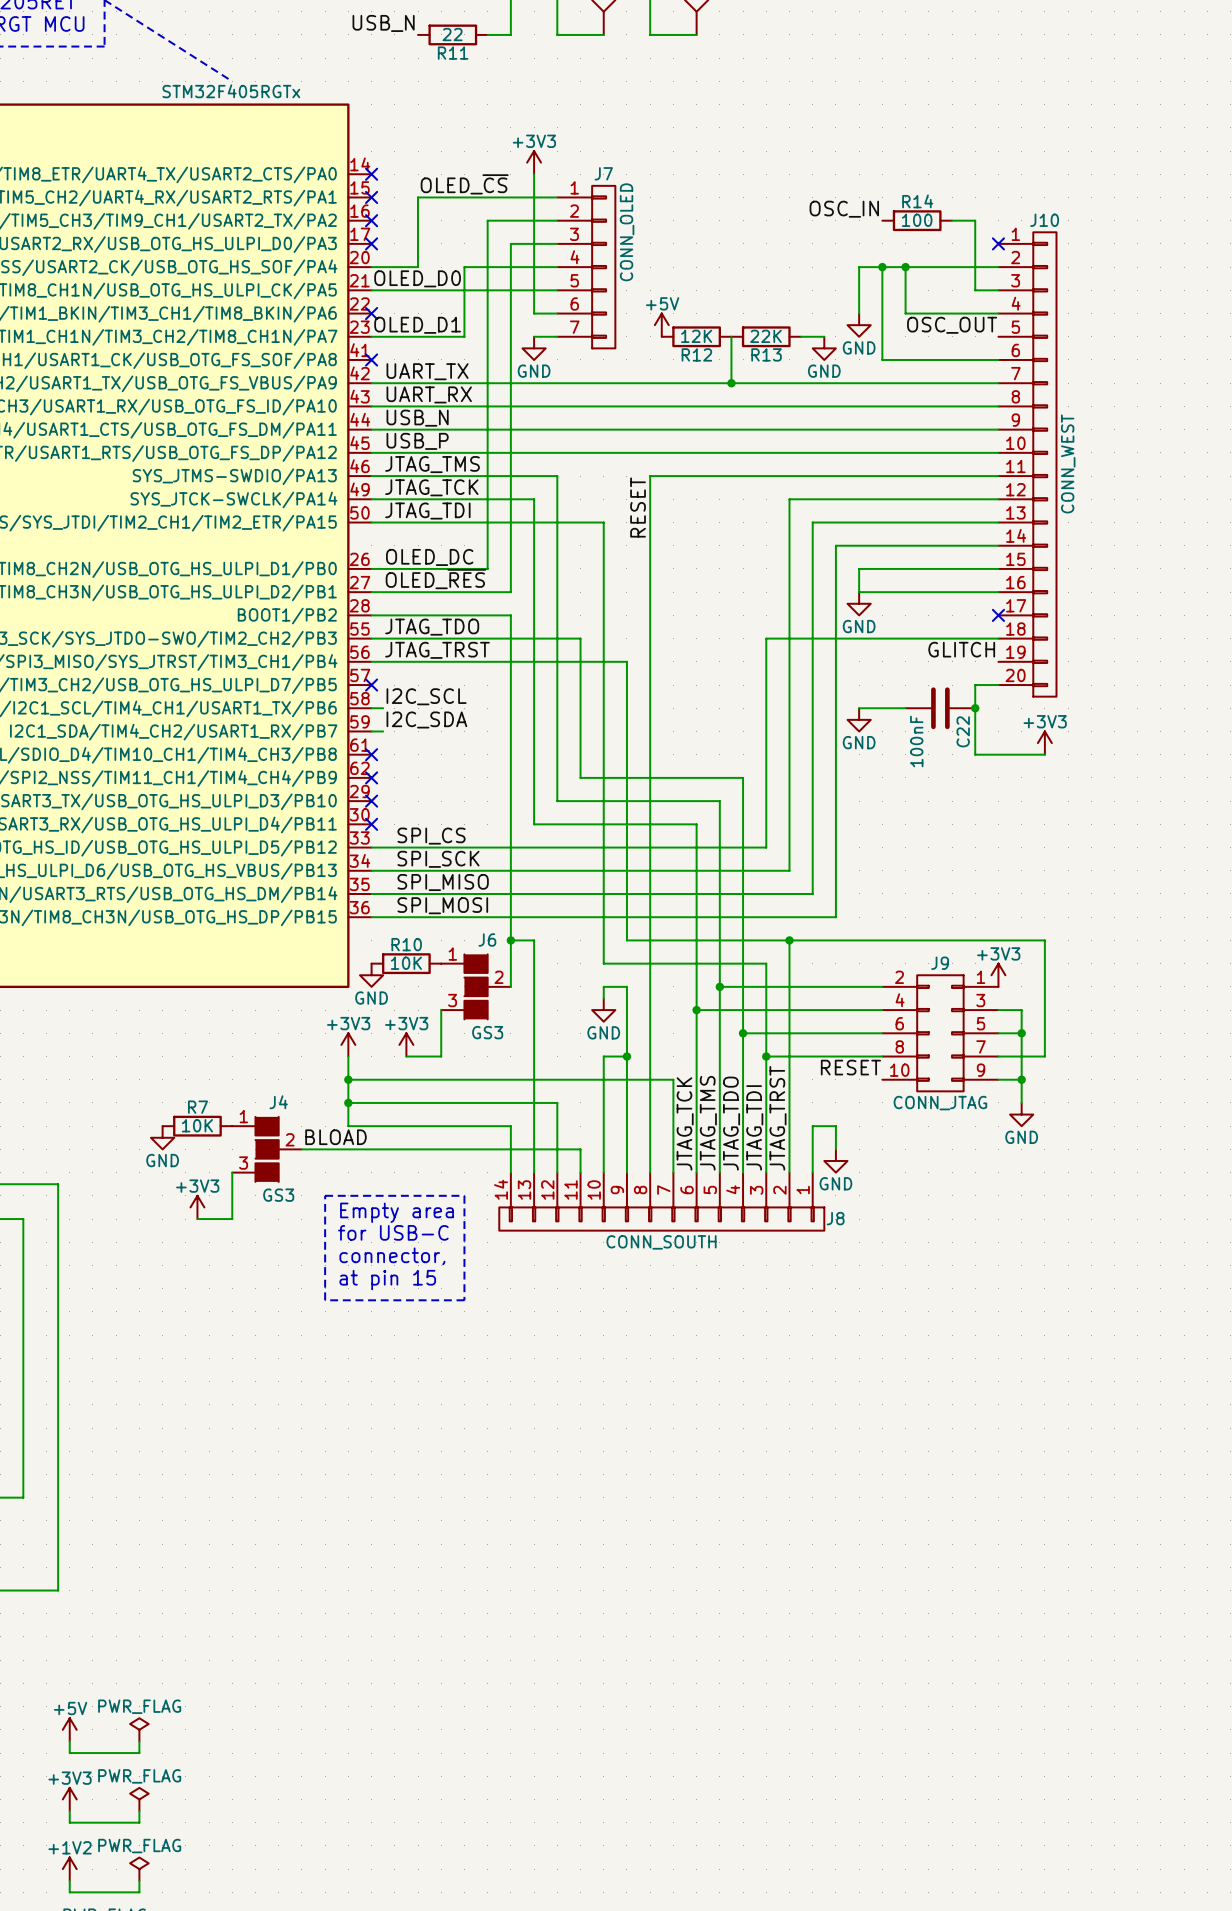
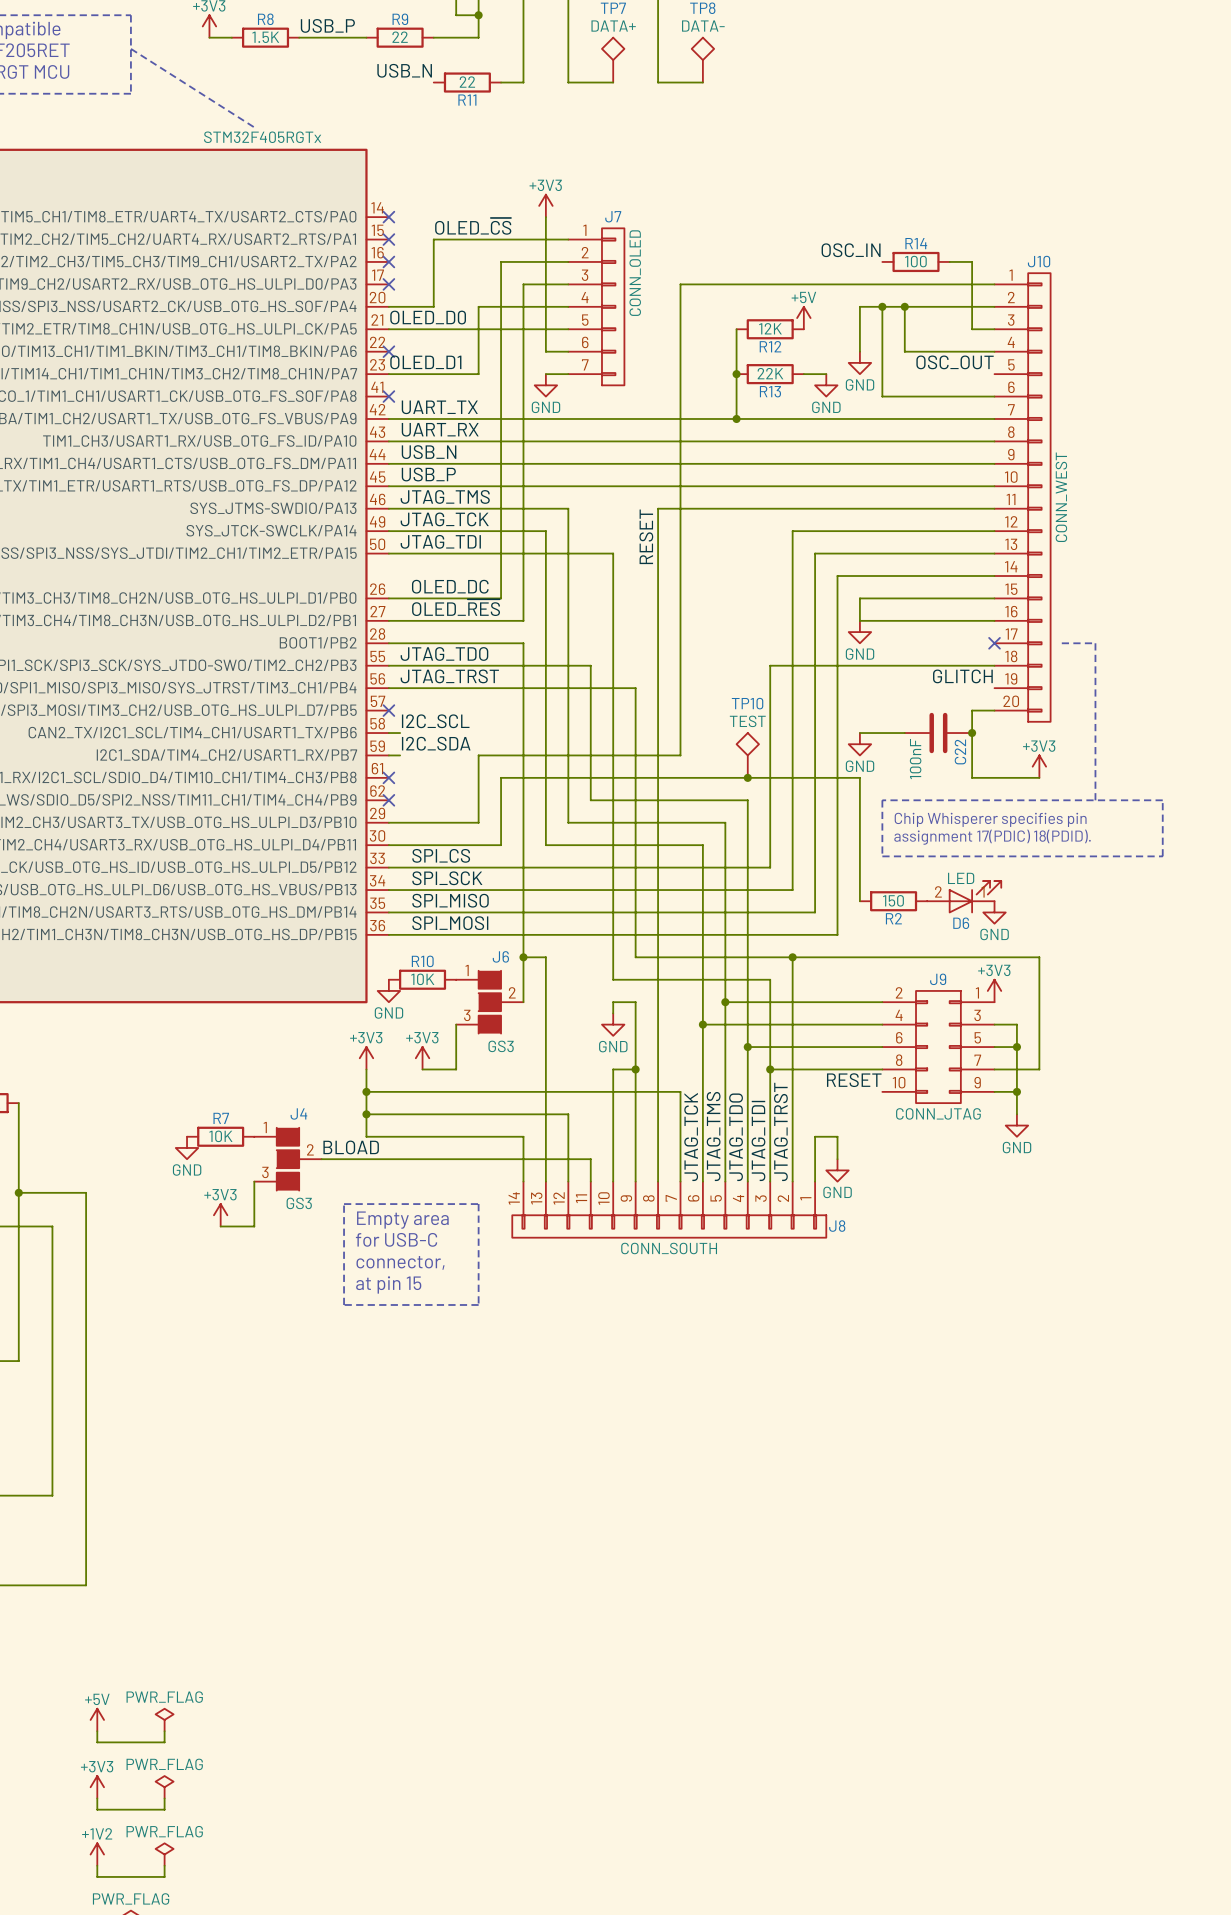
wire: none -> (994, 284) (680, 284) (680, 755) (478, 755) (478, 822) (388, 822)
no-connect mark: (998, 243) -> none
wire: none -> (736, 329) (736, 374)
power symbol position: +5V (661, 325) -> +5V (803, 318)
R12 position: (696, 336) -> (770, 329)
junction: none -> (736, 374)
line: none -> (1061, 643) (1095, 643) (1095, 800)
TP10: none -> TEST (747, 755)
junction: none -> (747, 777)
line: none -> (882, 800) (882, 856) (1162, 856) (1162, 800) (882, 800)
text: none -> Chip Whisperer specifies pin (990, 819)
no-connect mark: (371, 801) -> none
text: none -> assignment 17(PDIC) 18(PDID). (992, 837)
wire: none -> (388, 845) (501, 845) (501, 777) (859, 777) (859, 901)
no-connect mark: (371, 824) -> none
D6: none -> LED (964, 897)
R2: none -> 150 (893, 901)
power symbol: none -> GND (994, 912)

